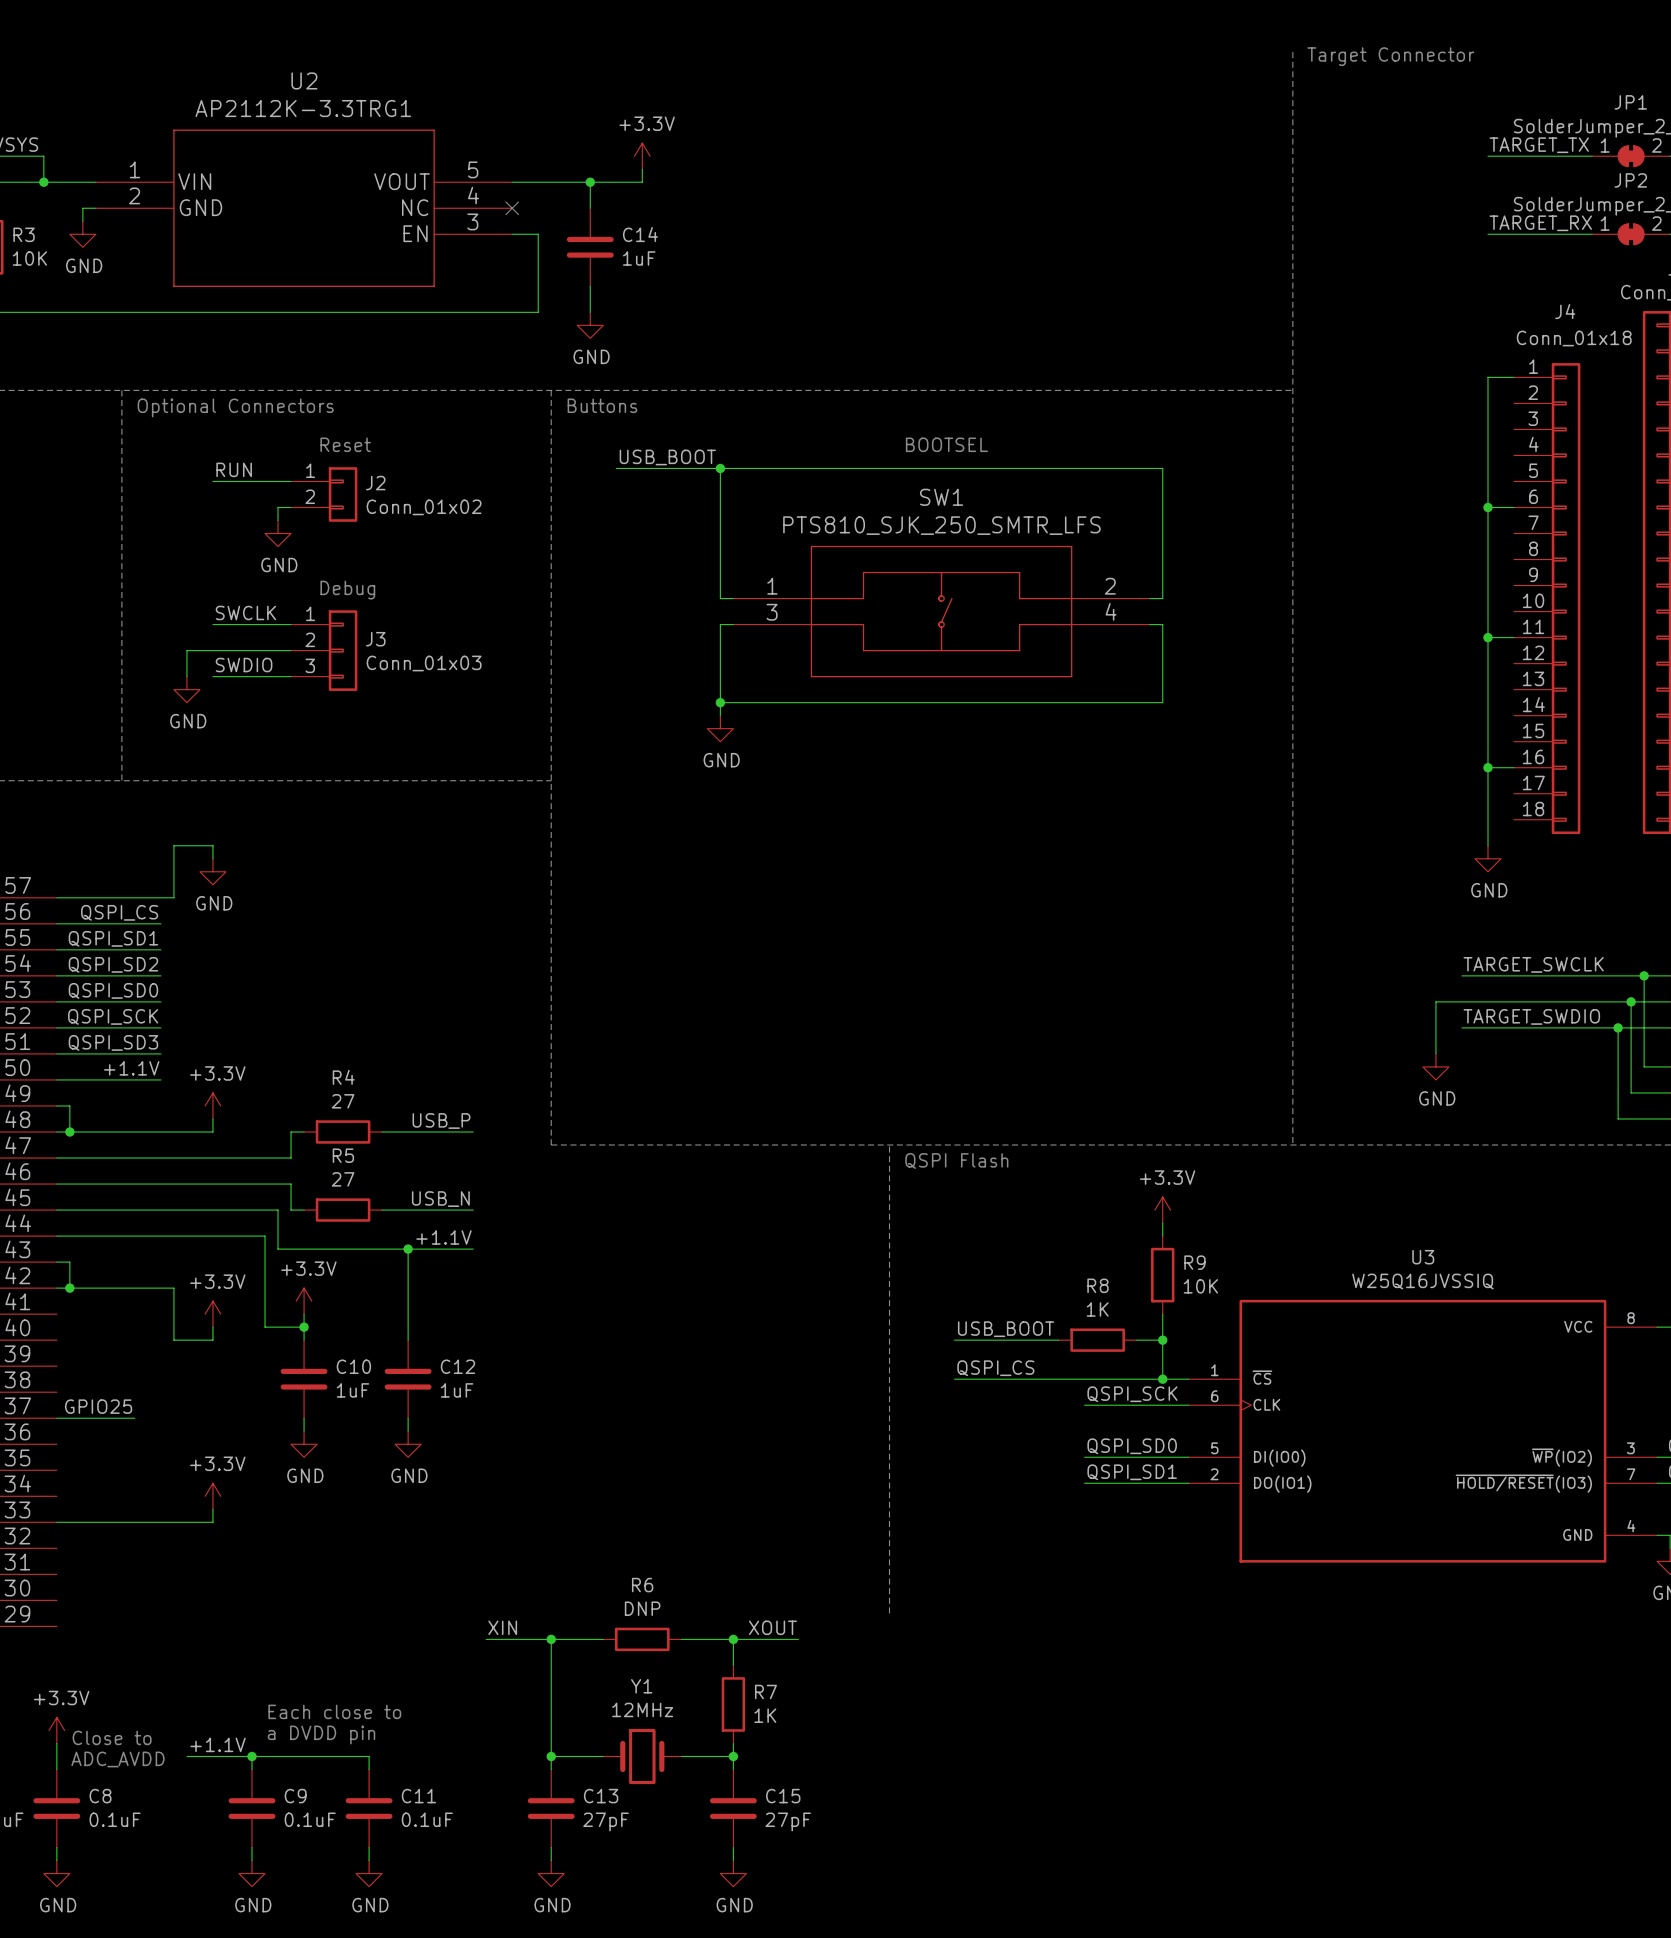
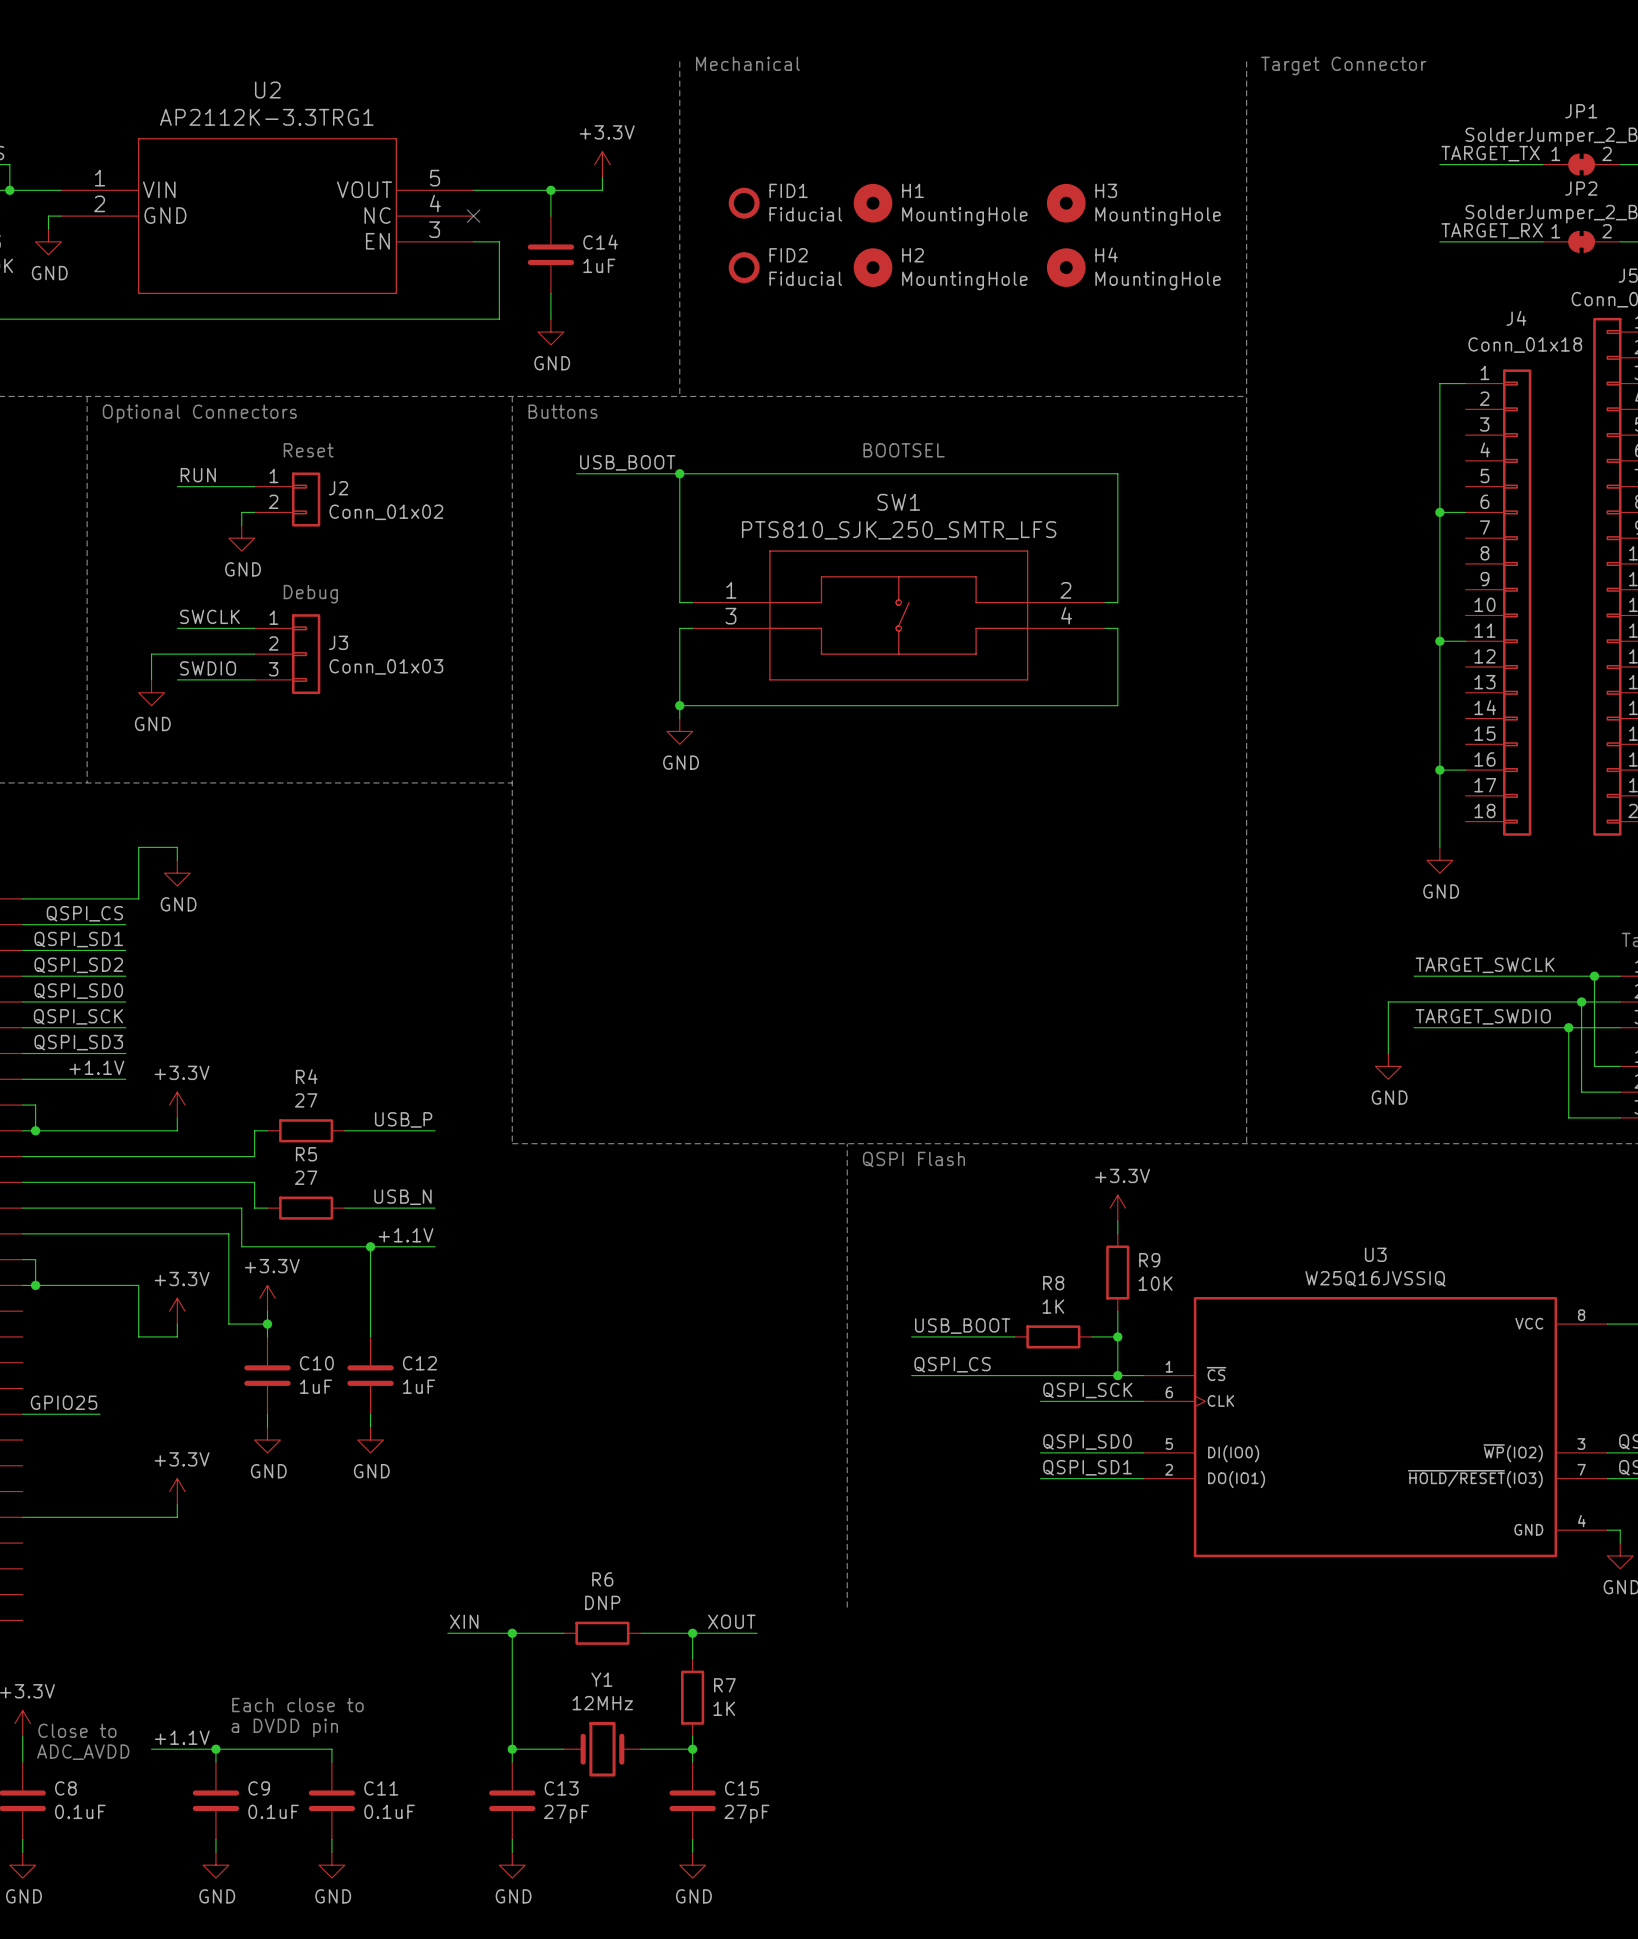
line: none -> (679, 61) (679, 396)
text: none -> Mechanical (747, 63)
FID1: none -> Fiducial (744, 203)
H1: none -> MountingHole (873, 203)
H3: none -> MountingHole (1066, 203)
FID2: none -> Fiducial (744, 267)
H2: none -> MountingHole (873, 267)
H4: none -> MountingHole (1066, 267)

